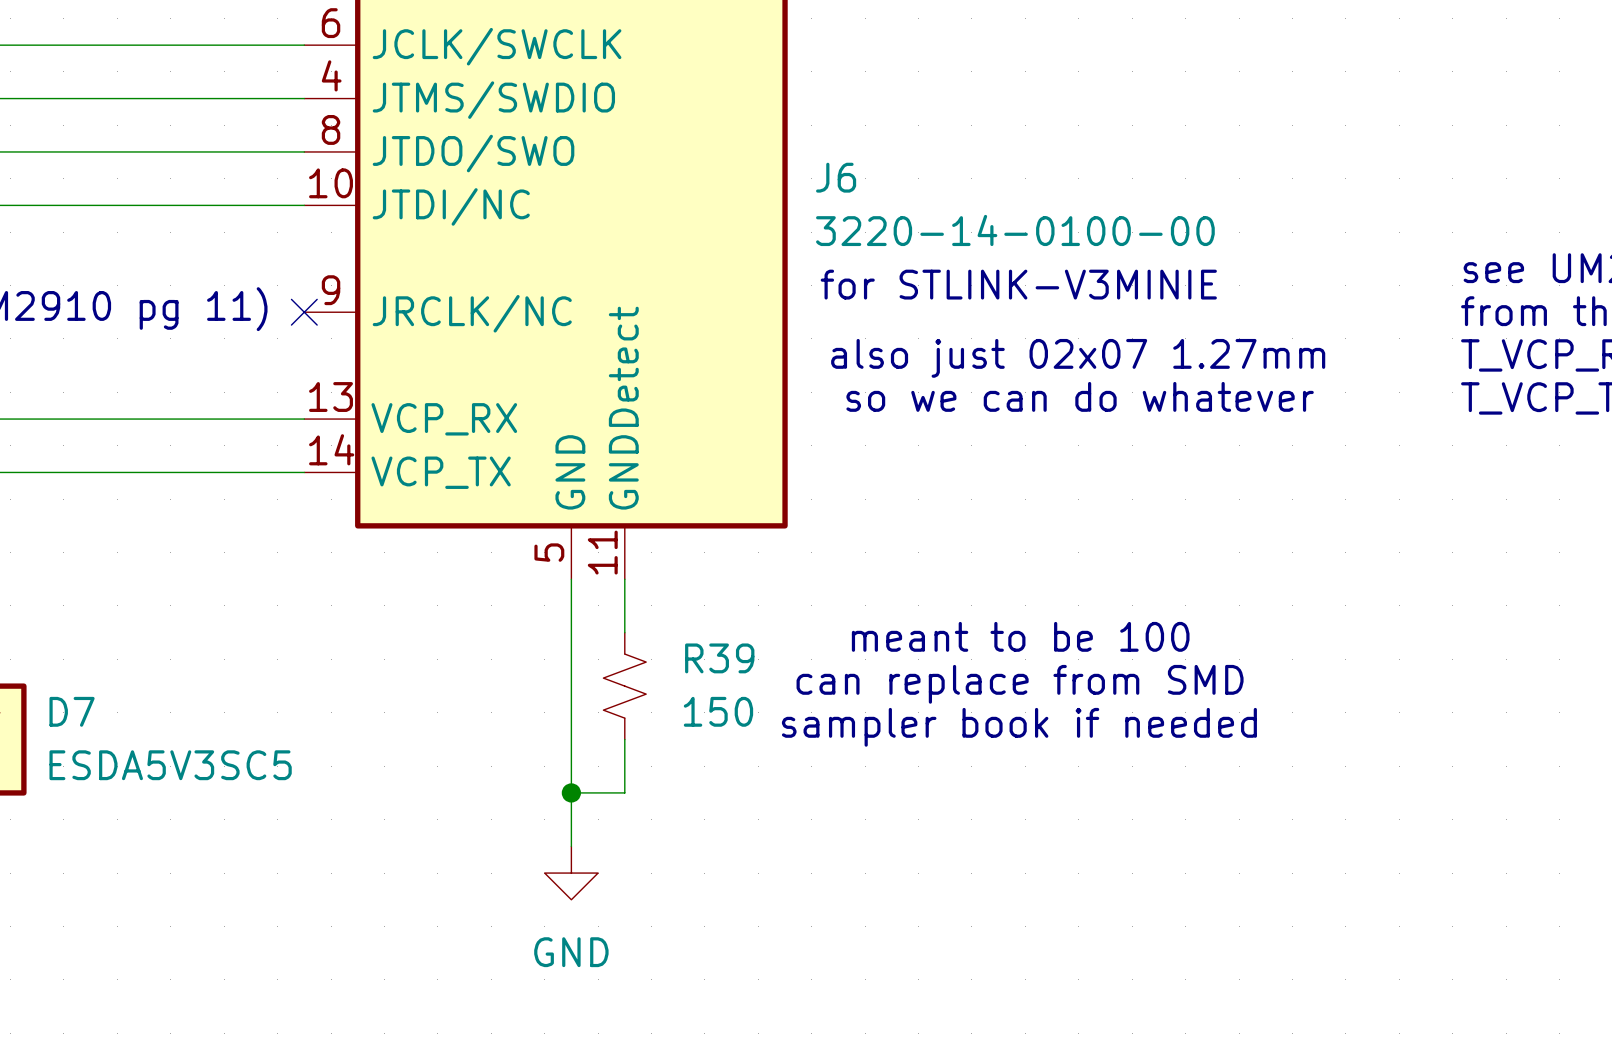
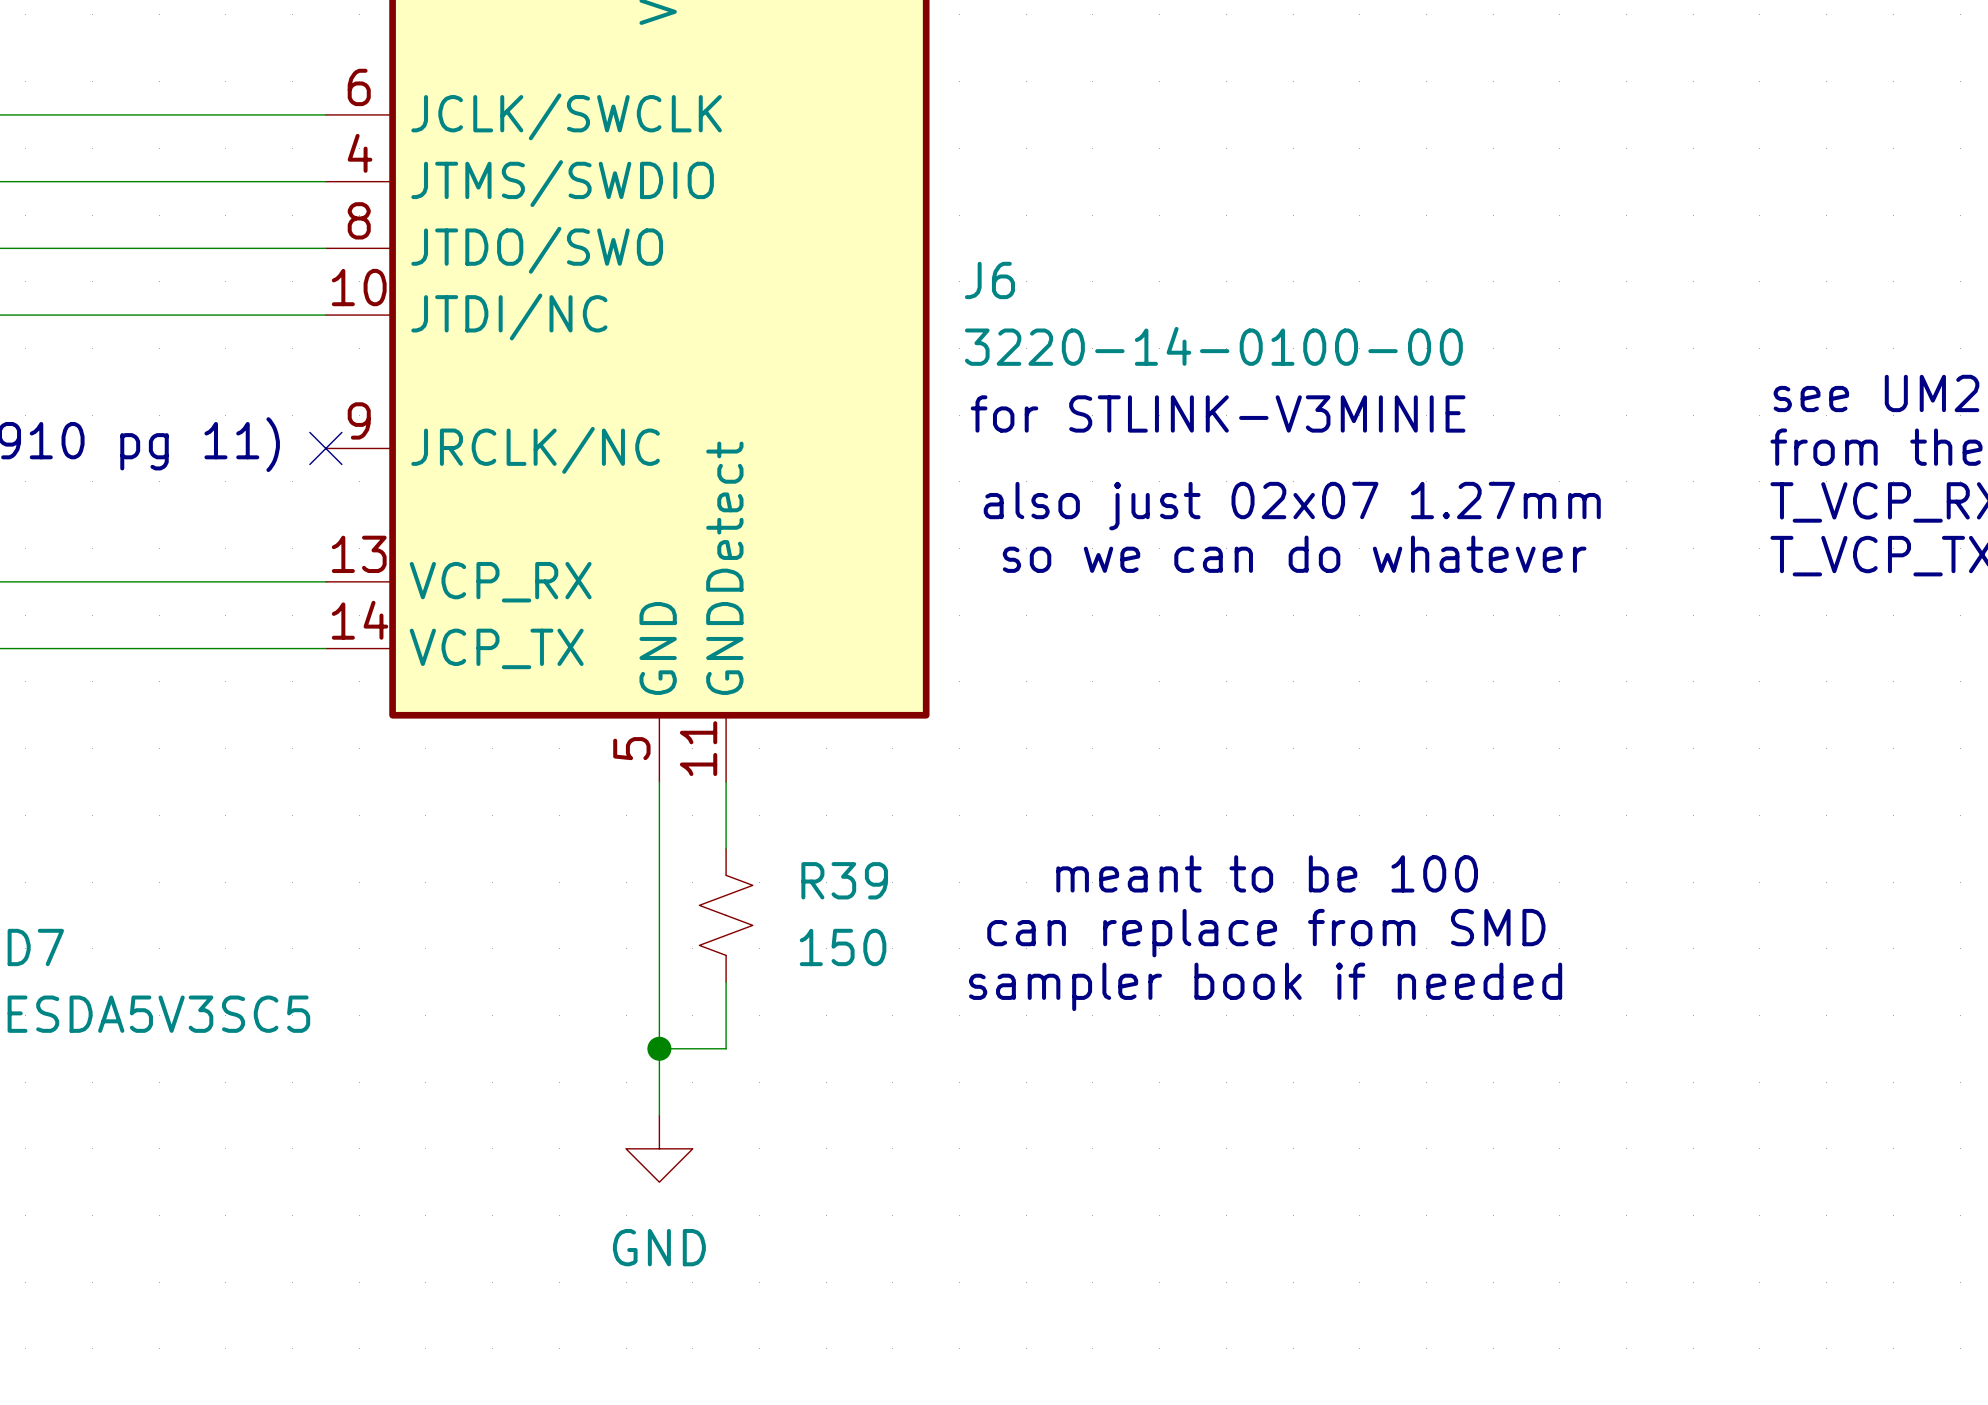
text position: meant to be 100 (1020, 636) -> meant to be 100 (1267, 873)
text position: can replace from SMD (1020, 684) -> can replace from SMD (1266, 933)
text position: sampler book if needed (1019, 727) -> sampler book if needed (1265, 986)

